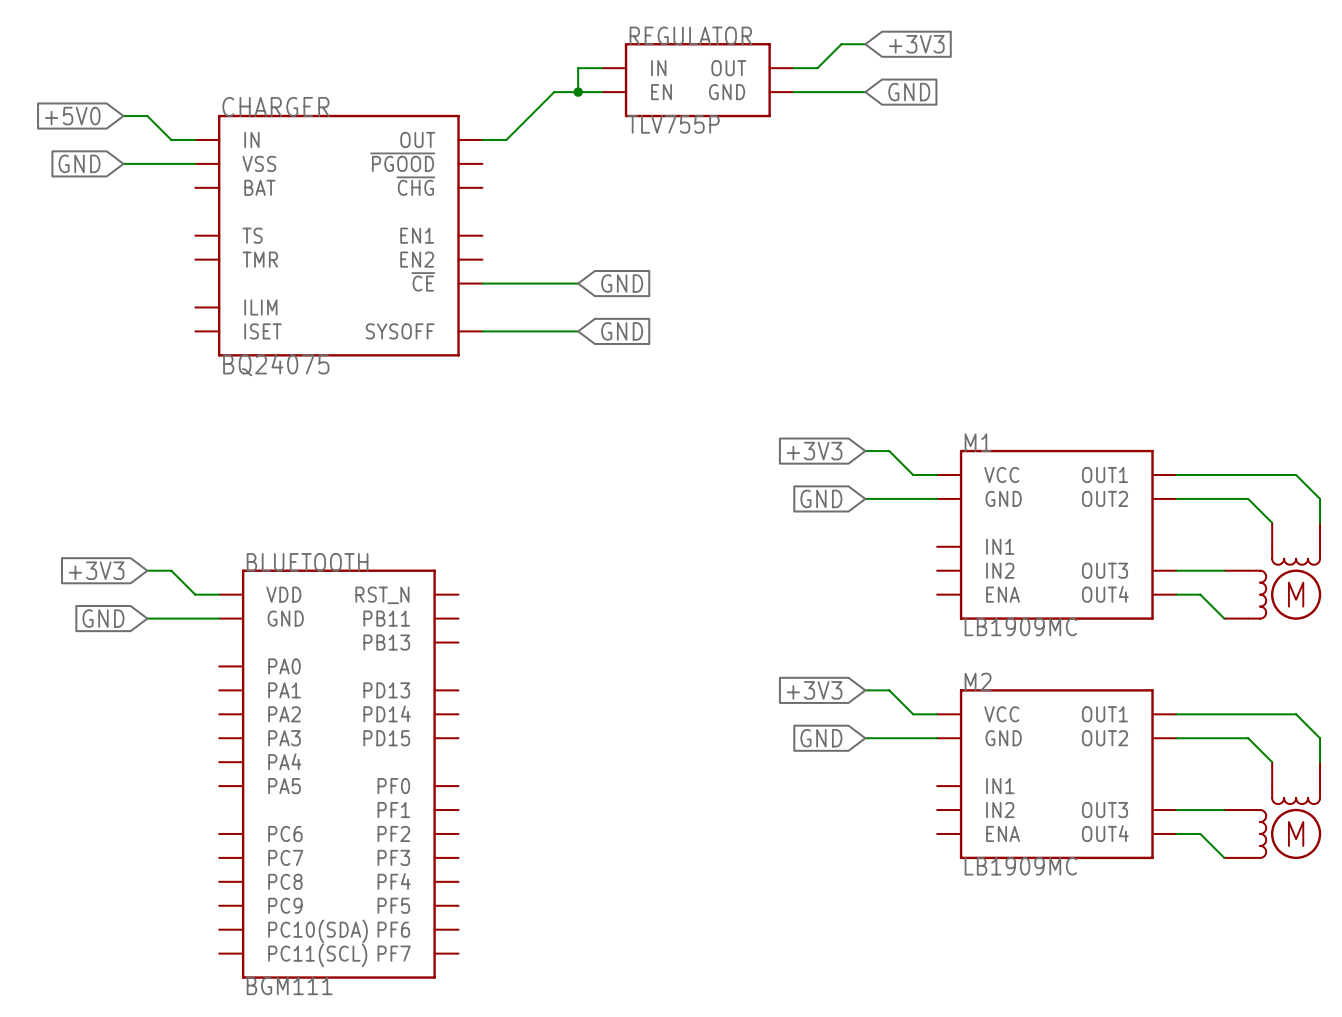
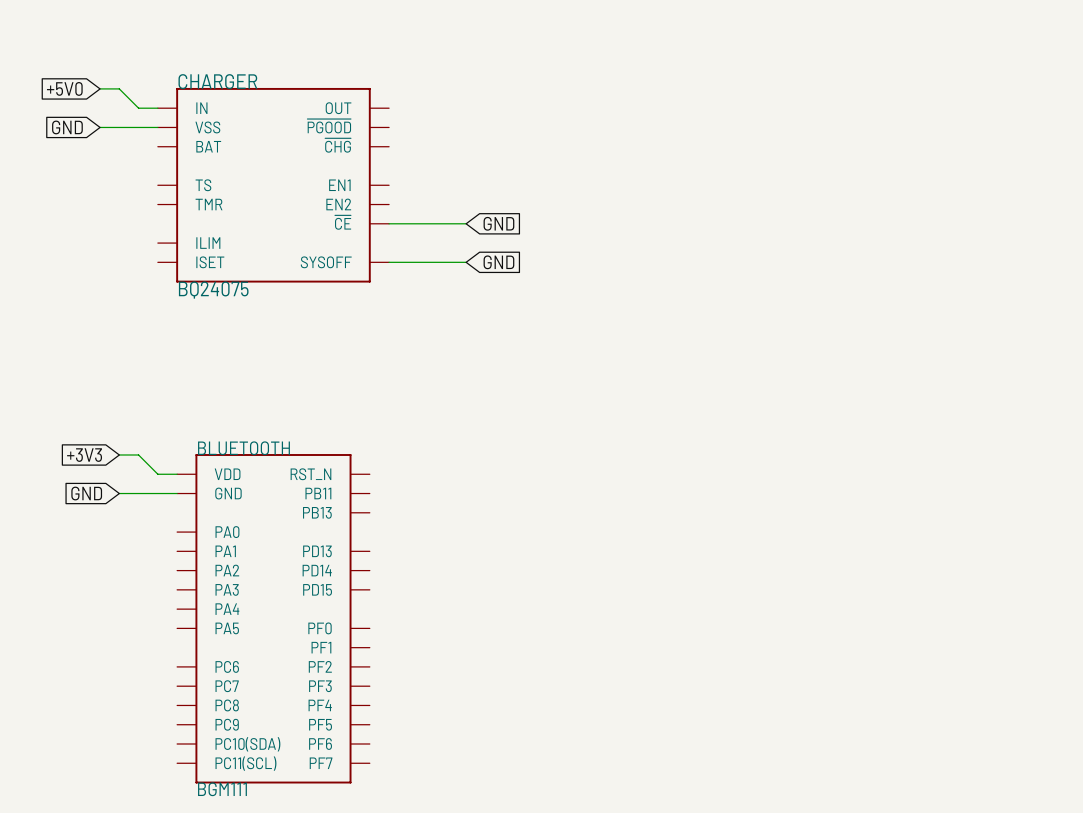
wire: (865, 44) (841, 44) (817, 68) (793, 68) -> none
global label: +3V3 (916, 44) -> none
wire: (602, 68) (578, 68) (578, 92) -> none
REGULATOR: TLV755P (697, 80) -> none
junction: (578, 92) -> none
wire: (602, 92) (554, 92) (506, 139) (482, 139) -> none
wire: (793, 92) (865, 92) -> none
global label: GND (909, 92) -> none
global label: +3V3 (814, 451) -> none
wire: (865, 451) (889, 451) (913, 475) (937, 475) -> none
wire: (1176, 475) (1296, 475) (1320, 498) (1320, 522) -> none
global label: GND (821, 498) -> none
wire: (865, 498) (937, 498) -> none
wire: (1176, 498) (1248, 498) (1272, 522) -> none
M1: LB1909MC (1056, 534) -> none
wire: (1176, 570) (1224, 570) -> none
part: (1272, 571) -> none
wire: (1176, 594) (1200, 594) (1224, 618) -> none
global label: +3V3 (814, 690) -> none
wire: (865, 690) (889, 690) (913, 714) (937, 714) -> none
wire: (1176, 714) (1296, 714) (1320, 738) (1320, 762) -> none
global label: GND (821, 738) -> none
wire: (865, 738) (937, 738) -> none
wire: (1176, 738) (1248, 738) (1272, 762) -> none
M2: LB1909MC (1056, 774) -> none
wire: (1176, 810) (1224, 810) -> none
part: (1272, 810) -> none
wire: (1176, 833) (1200, 833) (1224, 857) -> none

